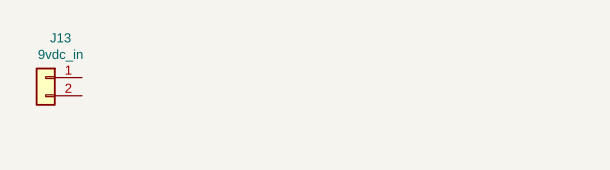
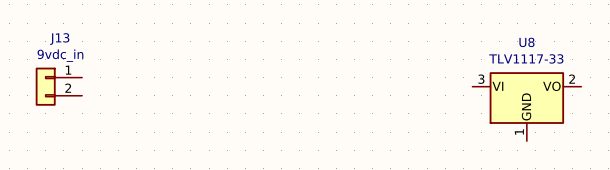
U8: none -> TLV1117-33 (526, 106)

